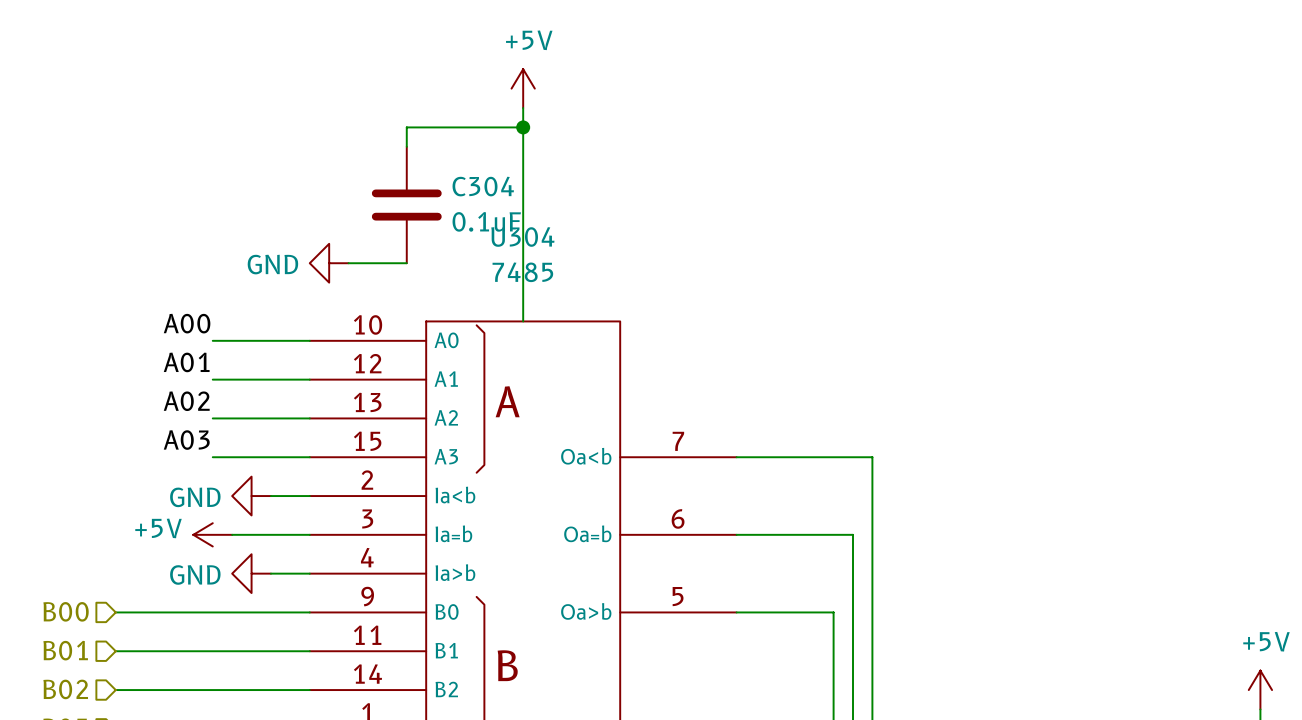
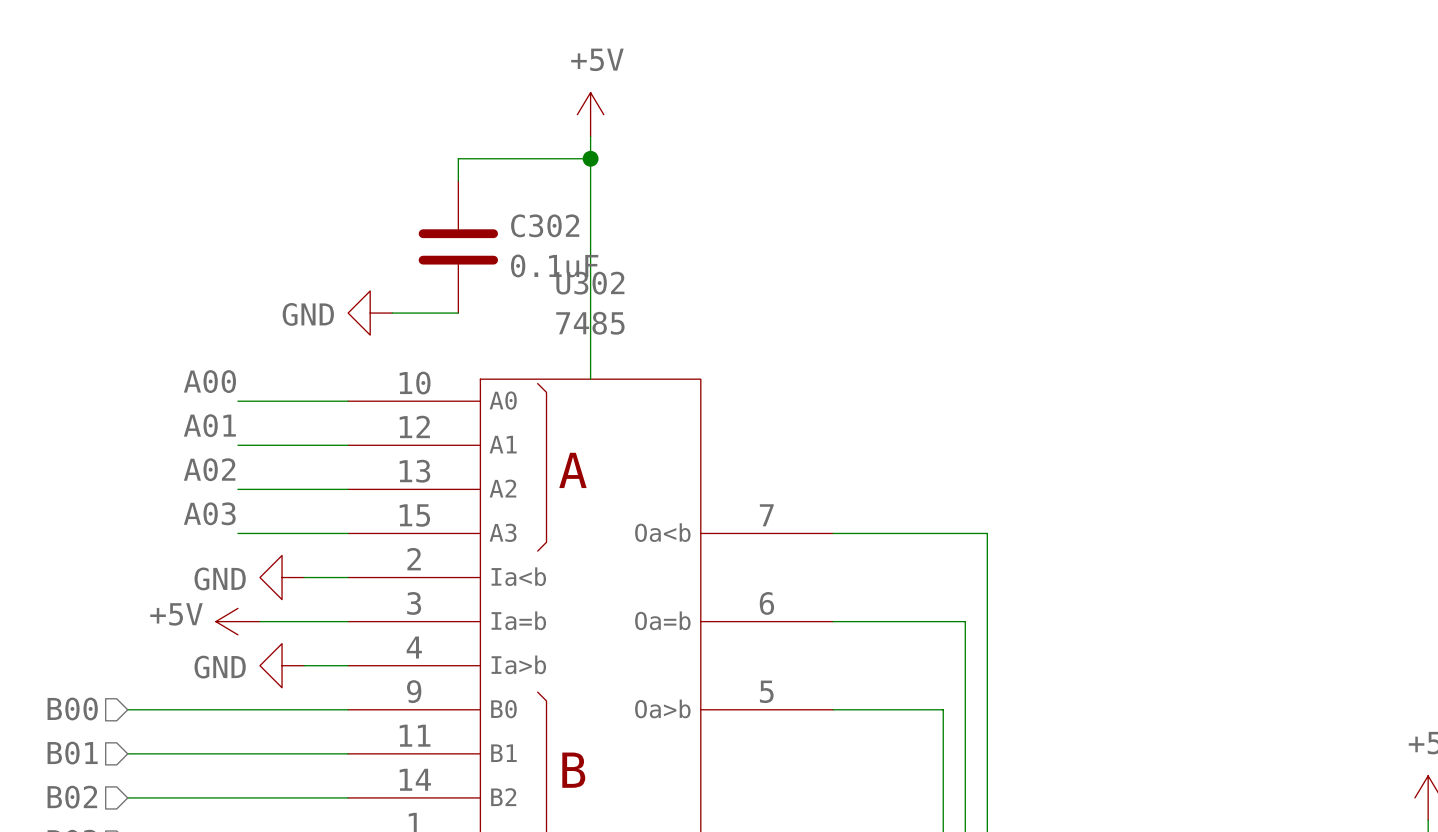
C304 name: C304 (483, 186) -> C302 (545, 225)
U304 name: U304 (522, 237) -> U302 (590, 283)

